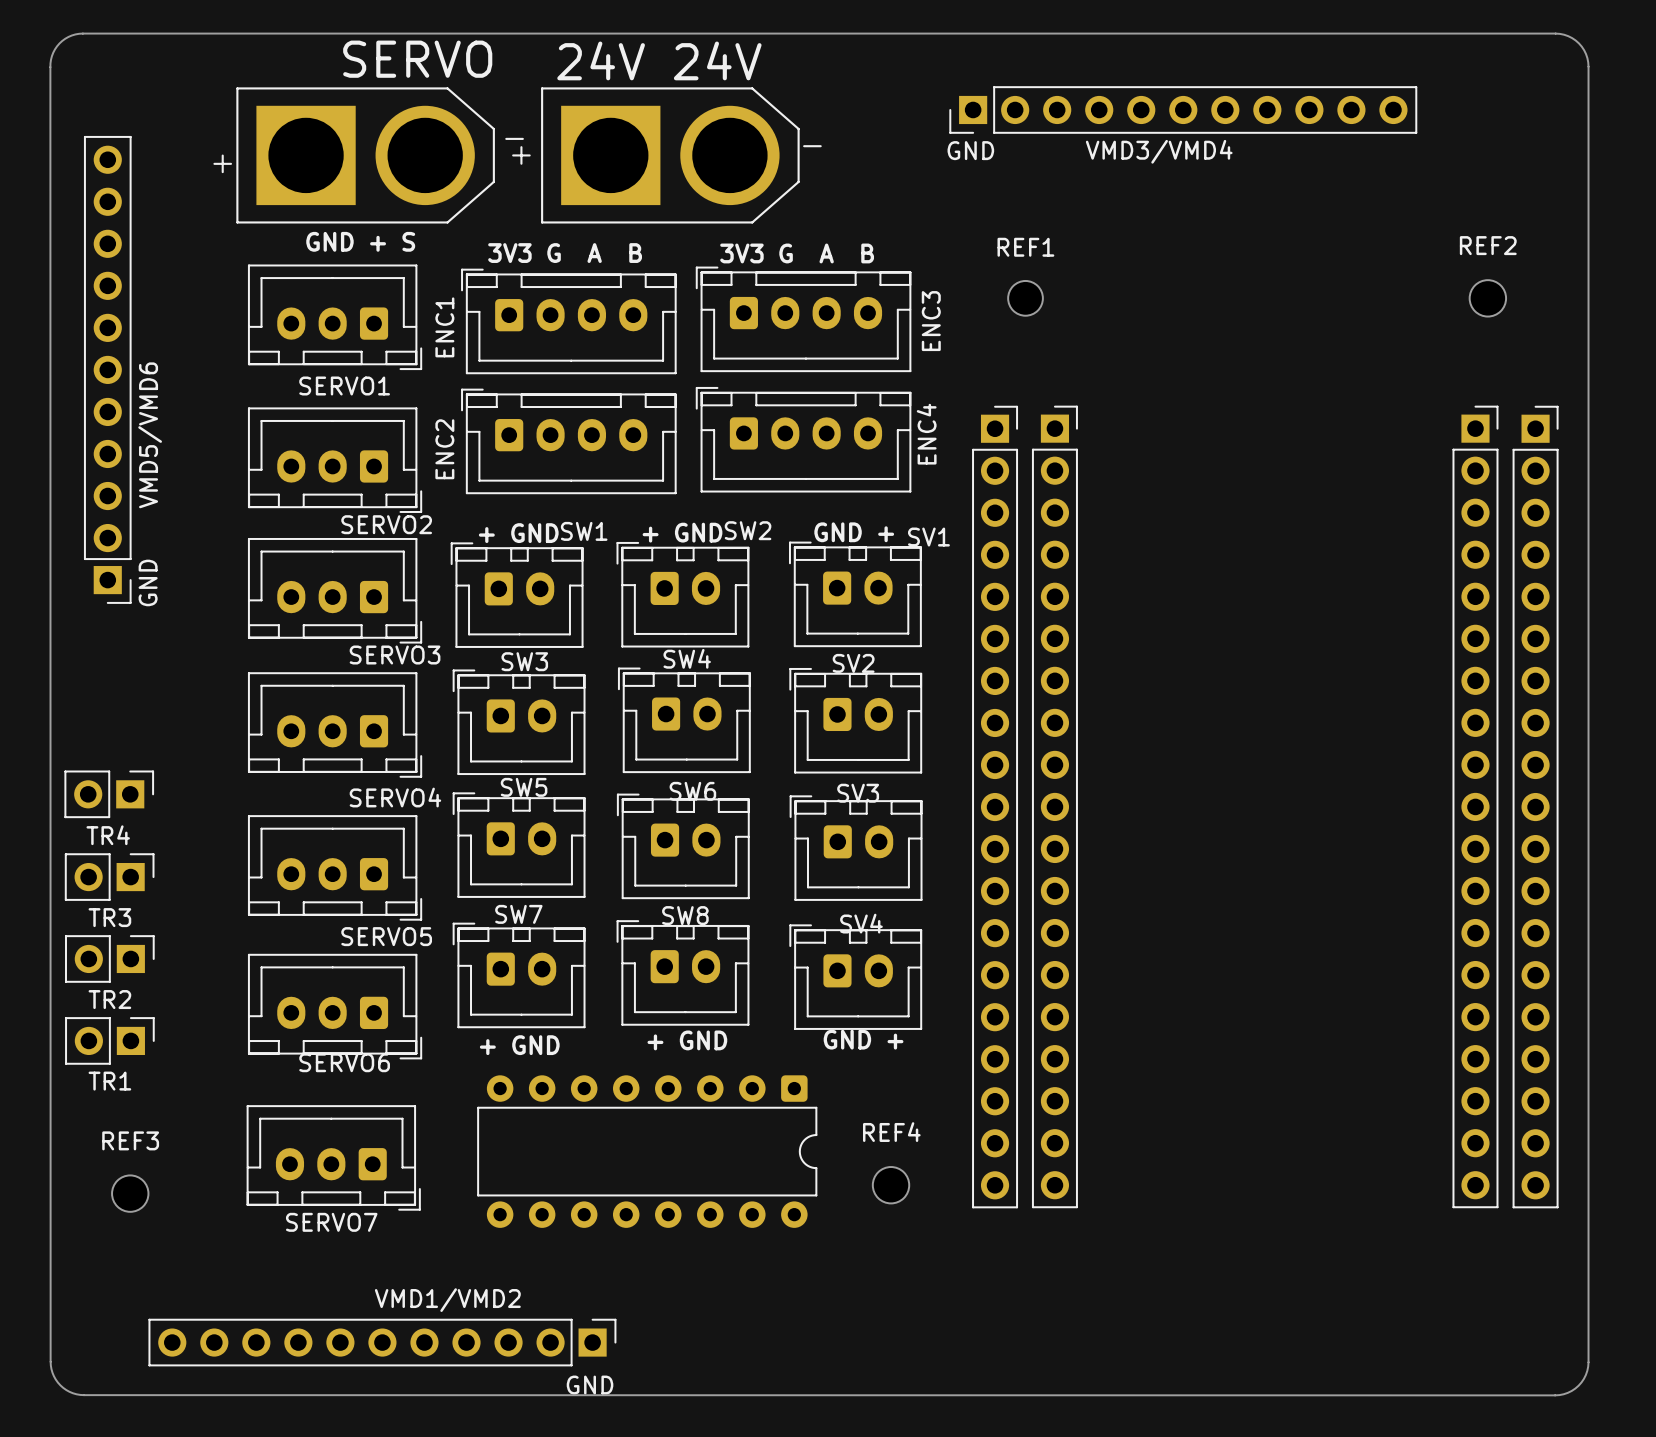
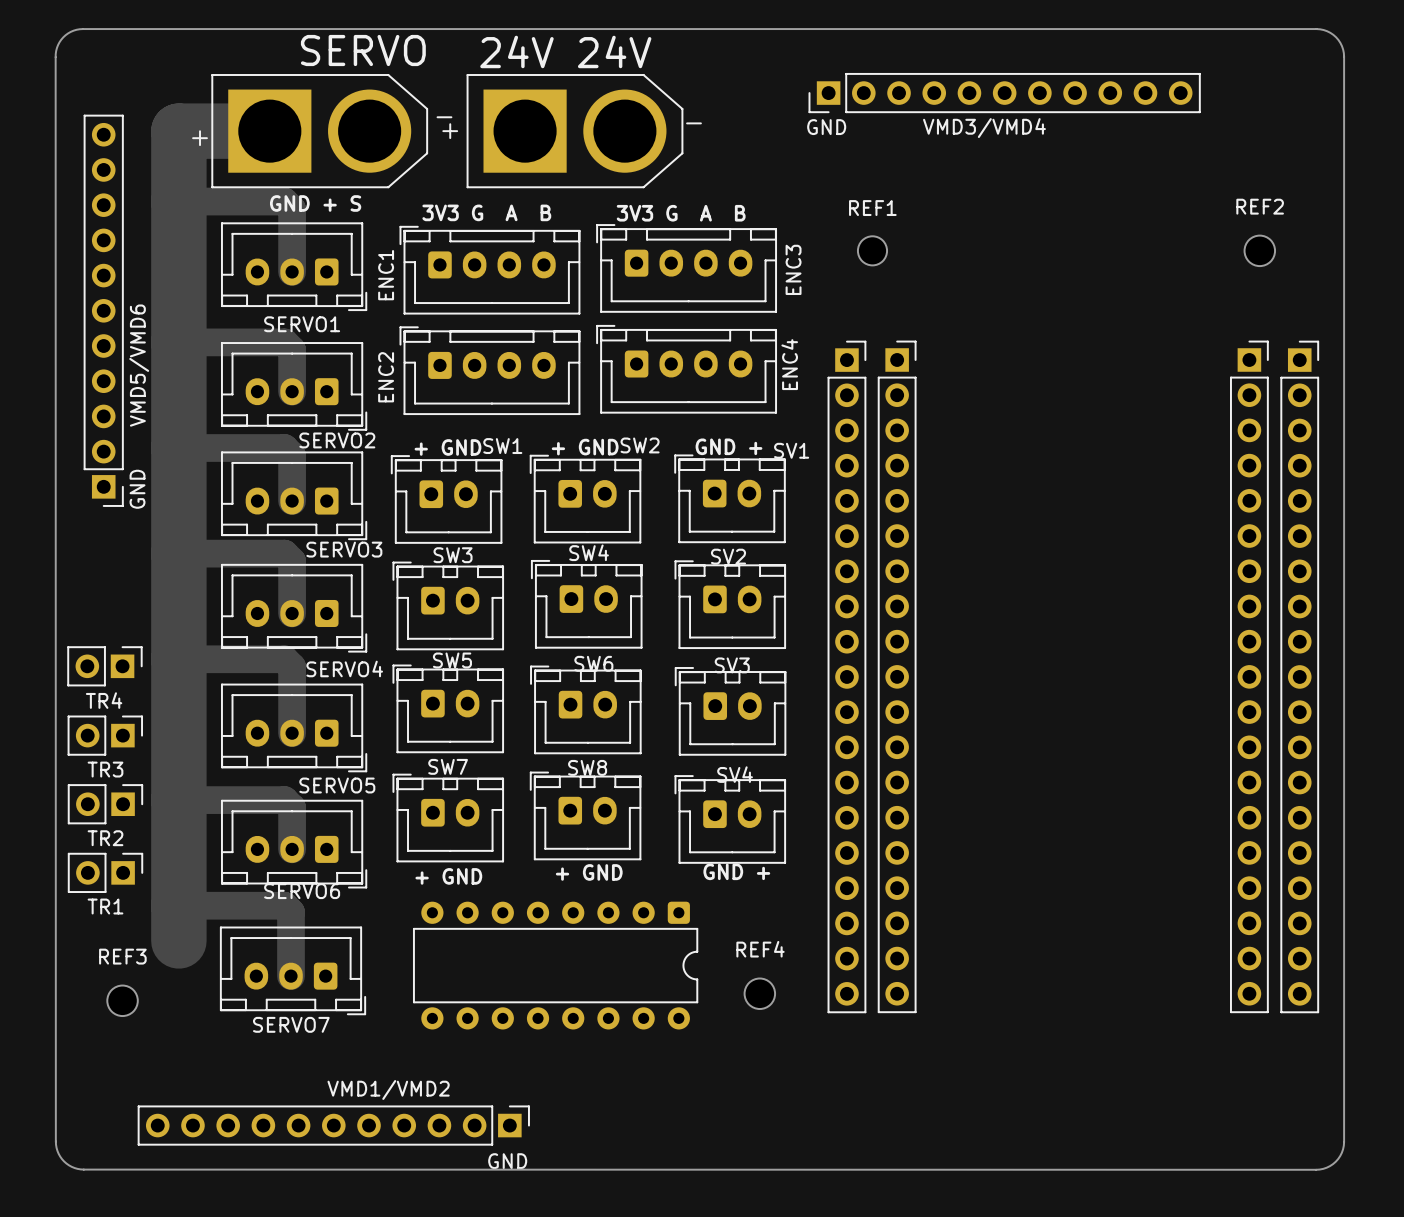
track: none -> (269, 131) (178, 131) (178, 940)
track: none -> (178, 201) (284, 201) (292, 209) (292, 271)
track: none -> (178, 342) (284, 342) (292, 349) (292, 391)
track: none -> (178, 448) (284, 448) (292, 455) (292, 501)
track: none -> (178, 553) (284, 553) (292, 561) (292, 613)
track: none -> (178, 659) (284, 659) (292, 666) (292, 733)
track: none -> (178, 800) (284, 800) (292, 807) (292, 849)
track: none -> (178, 905) (284, 905) (291, 912) (291, 976)

